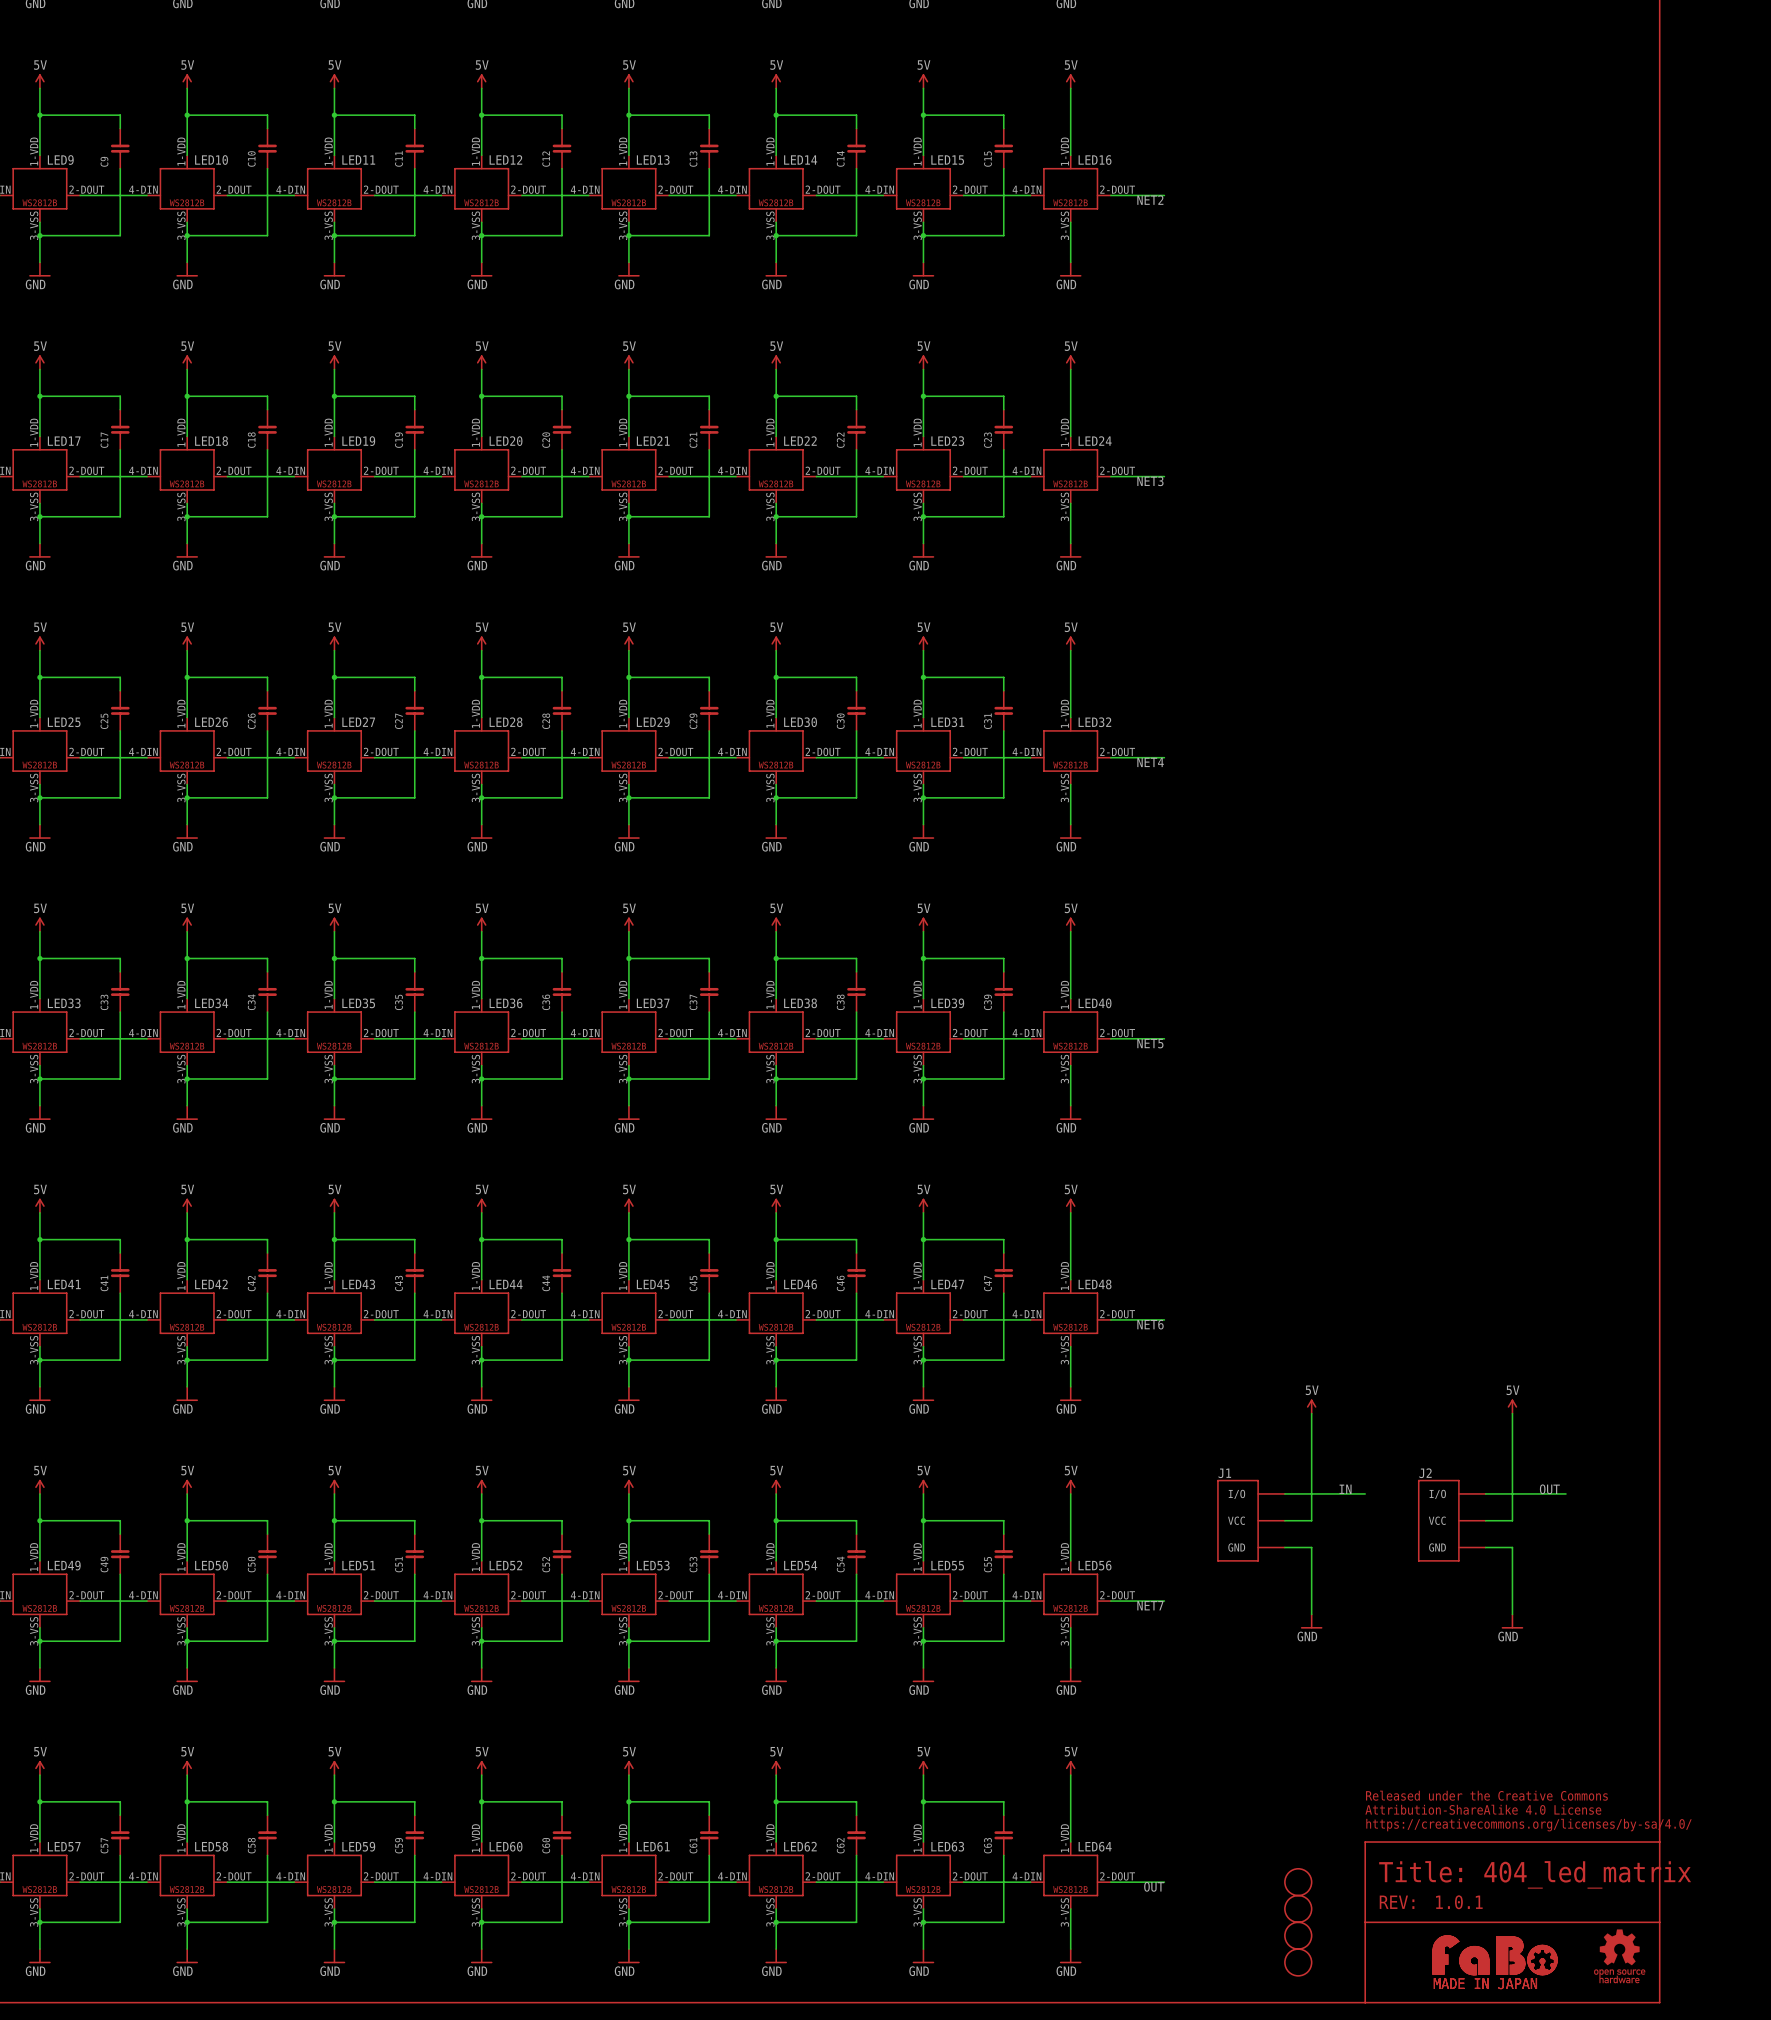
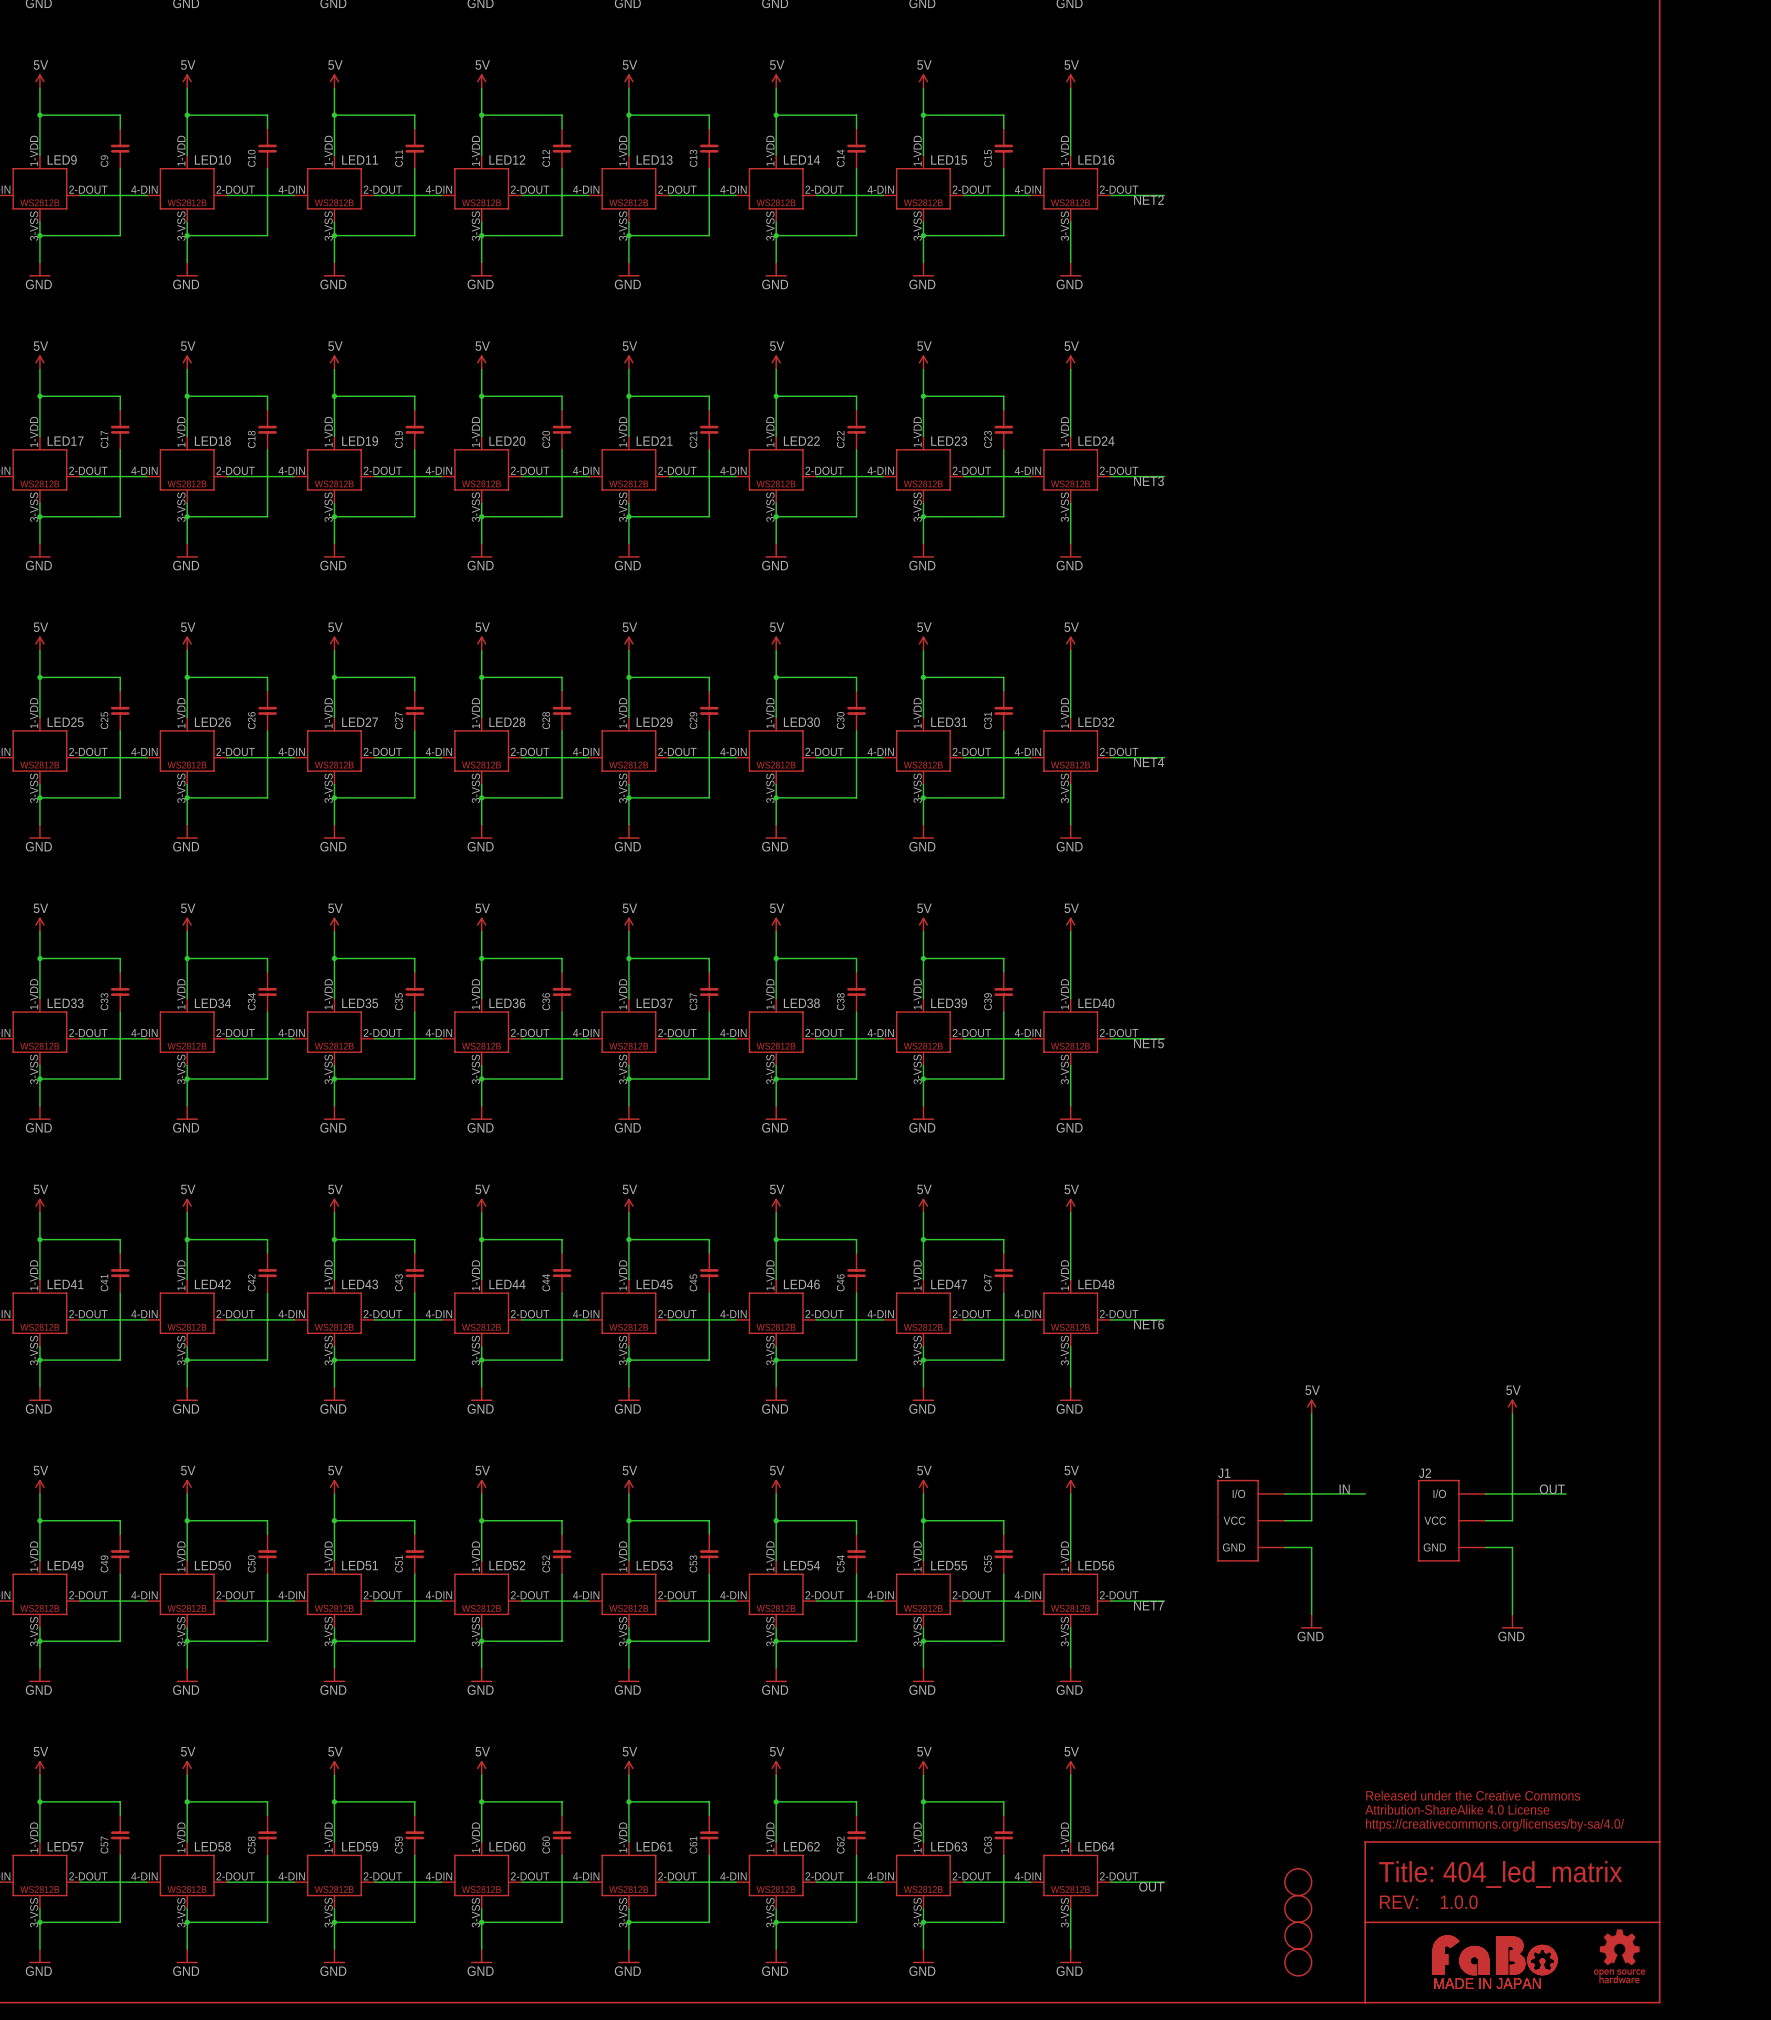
text: 1.0.1 (1459, 1902) -> 1.0.0 (1459, 1902)

